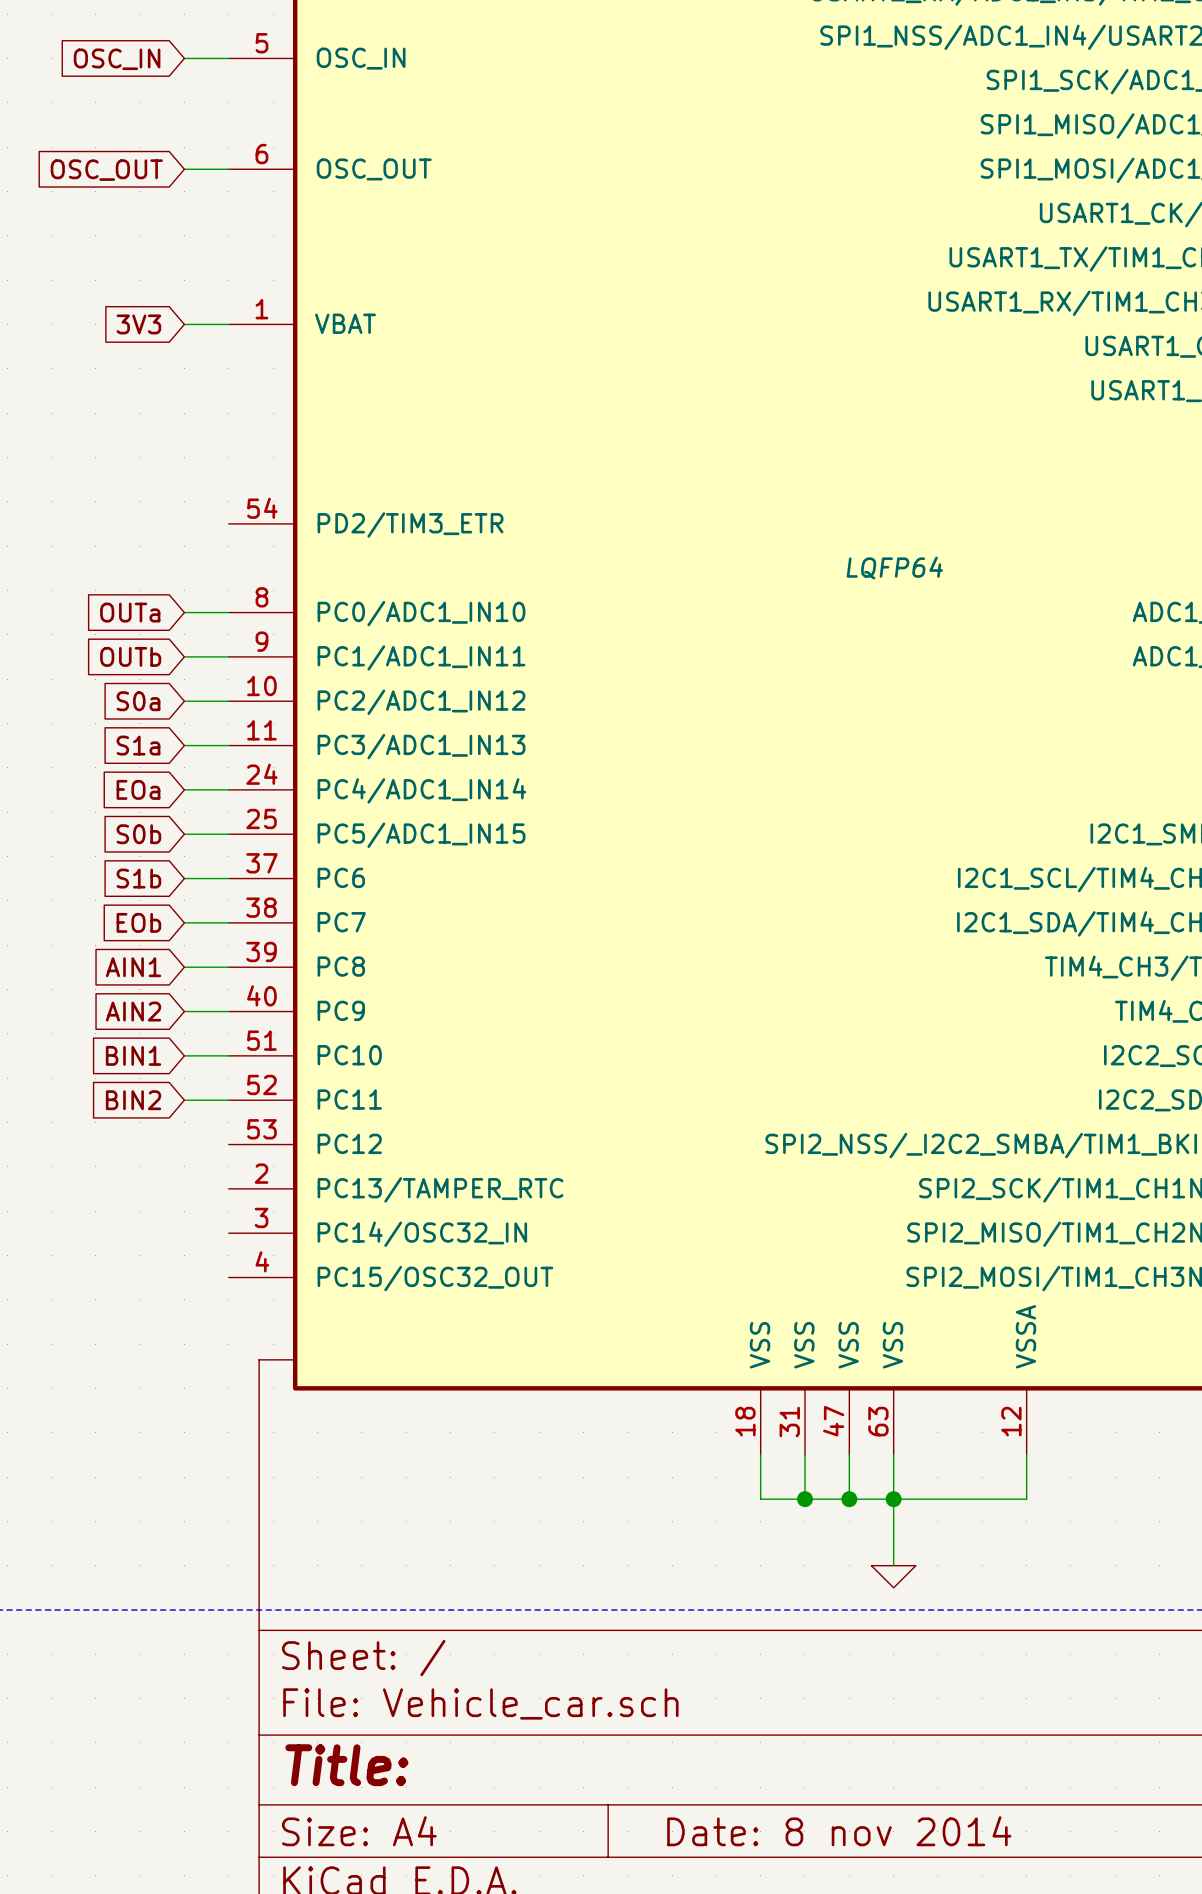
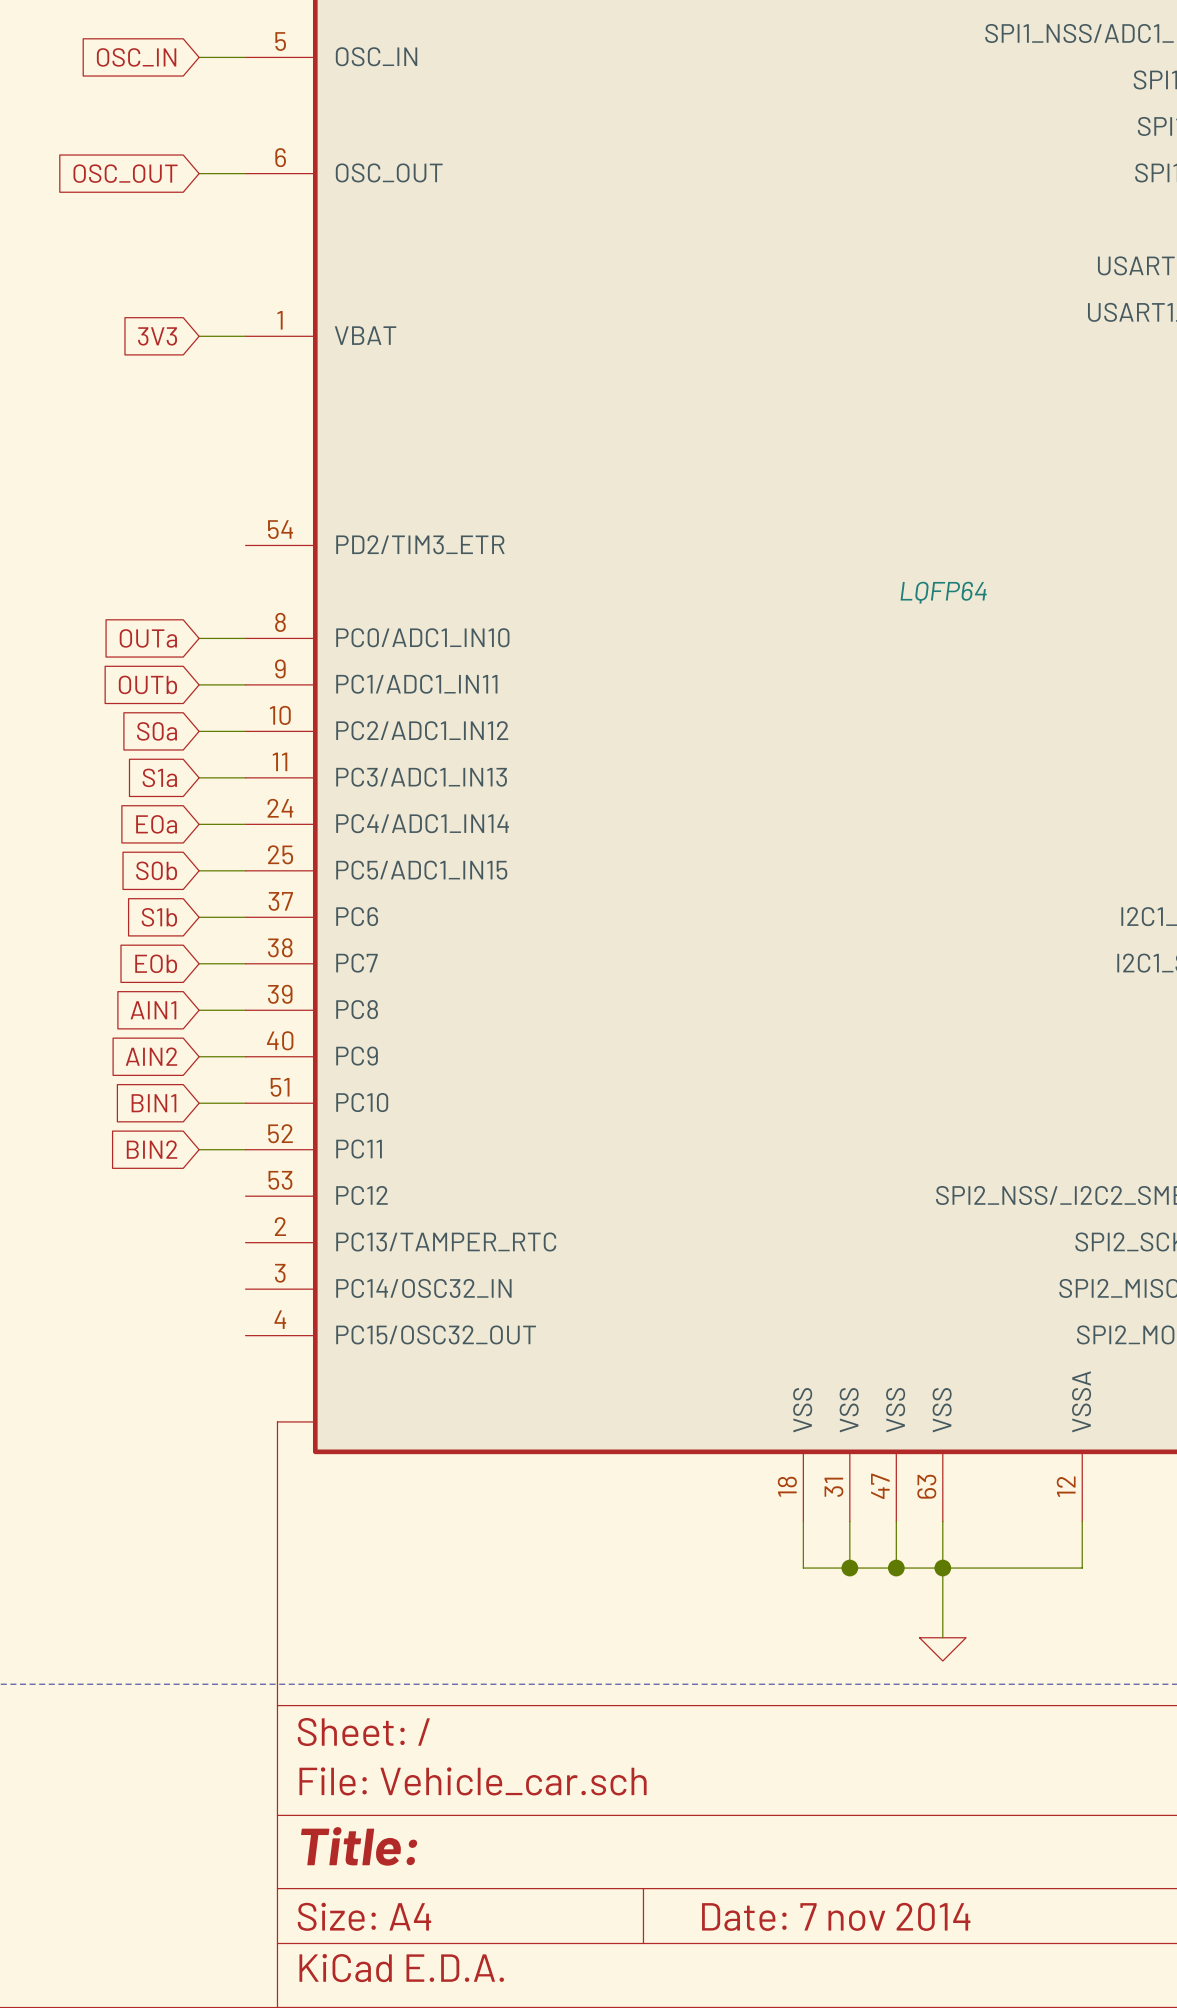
title block: Date: 8 nov 2014 (839, 1831) -> Date: 7 nov 2014 (836, 1916)

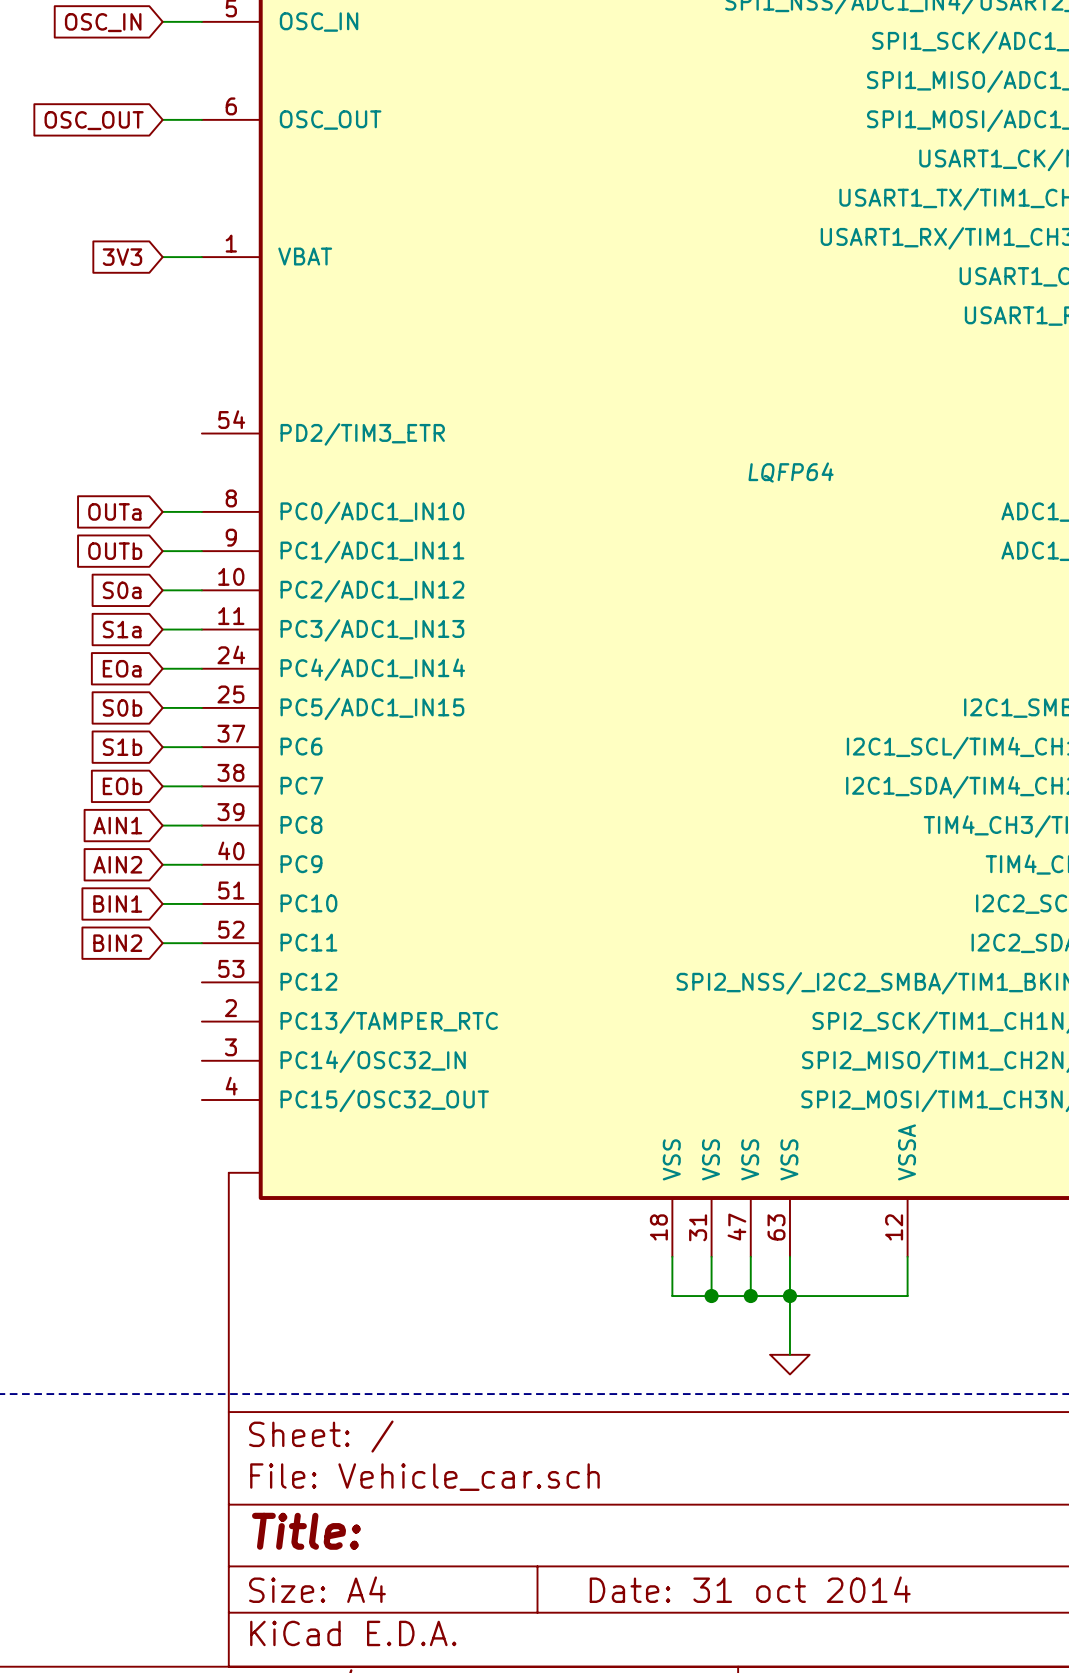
title block: Date: 7 nov 2014 (836, 1916) -> Date: 31 oct 2014 (750, 1589)

